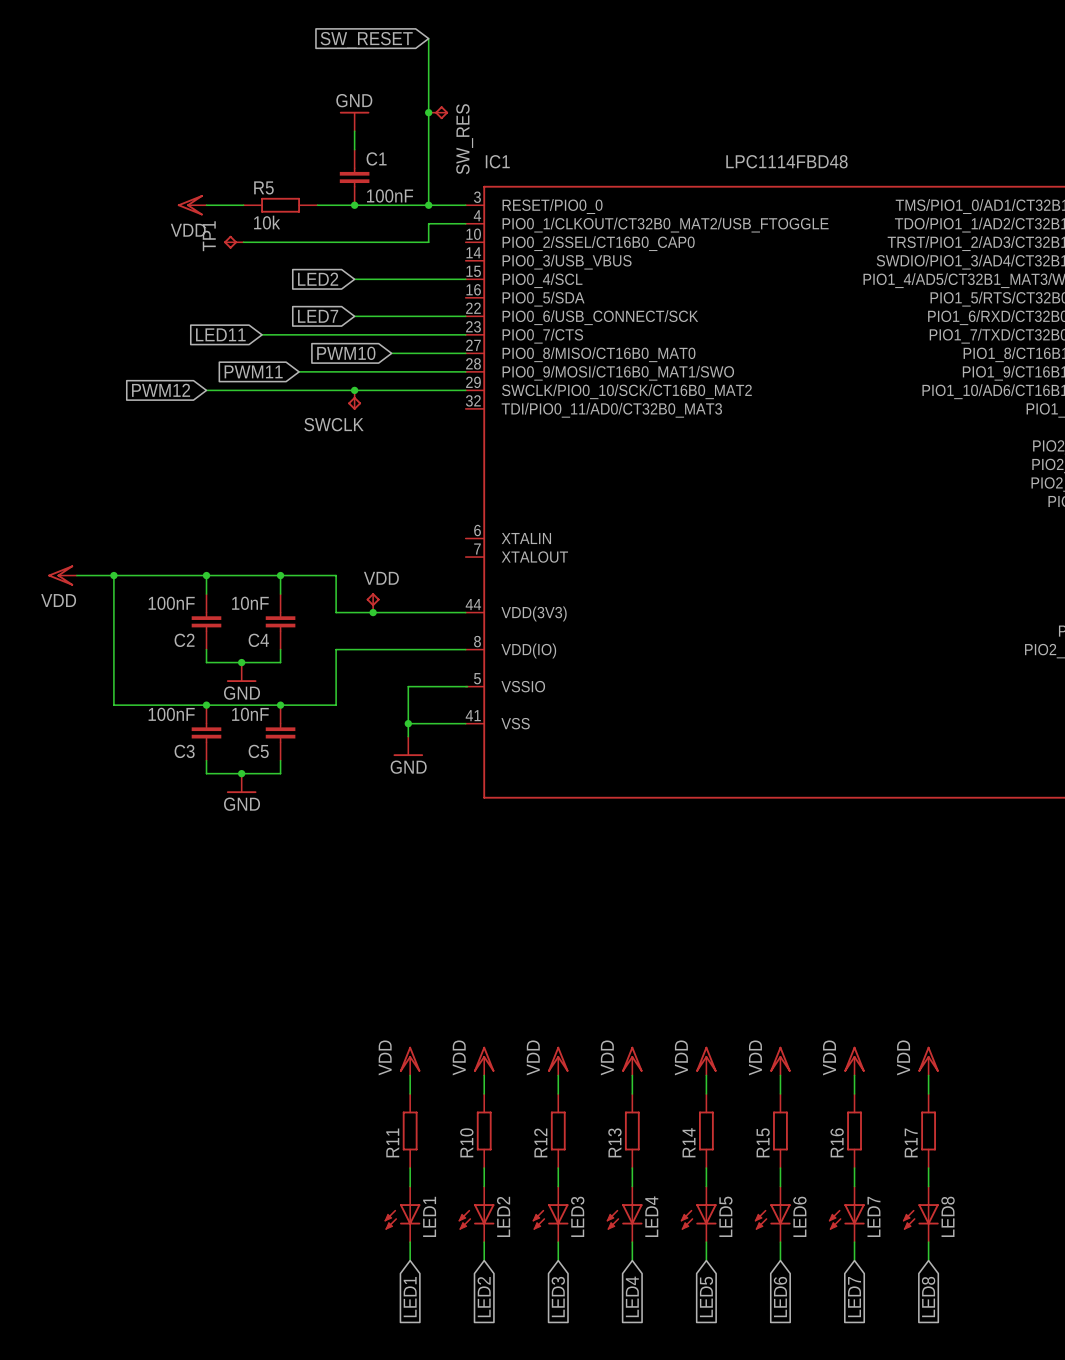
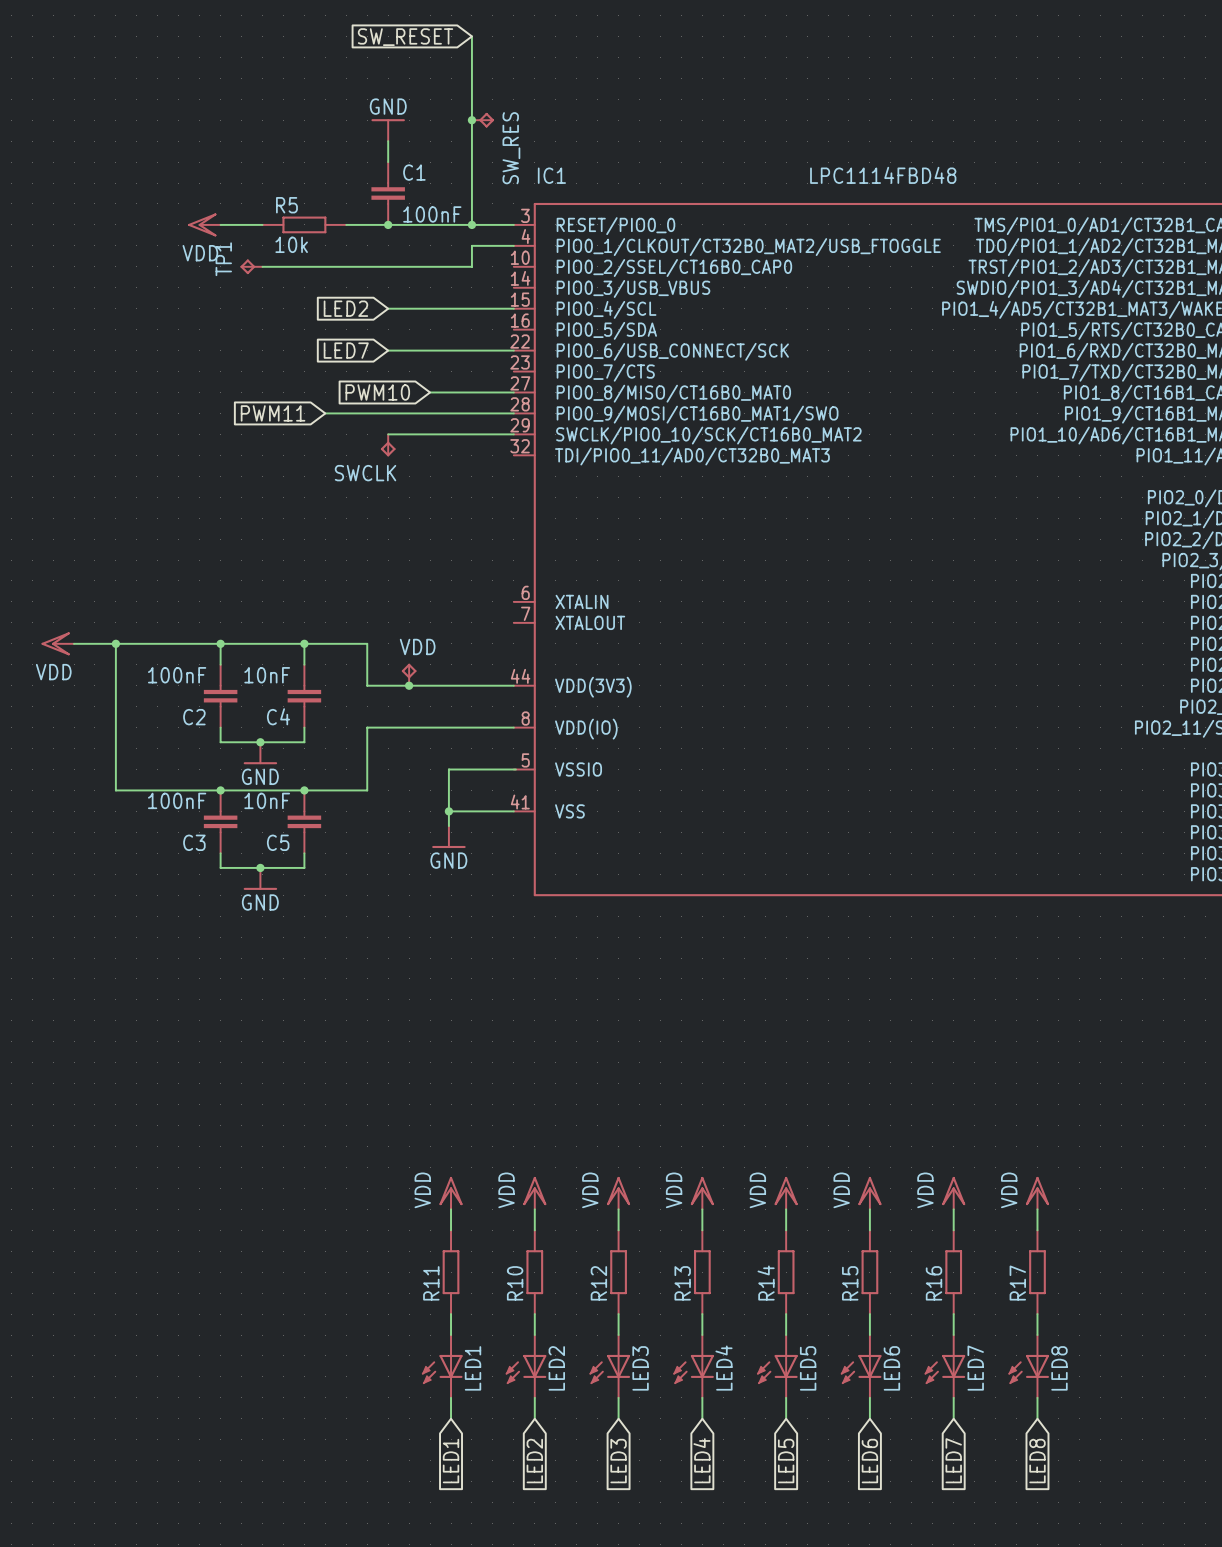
global label: LED11 (220, 334) -> none
wire: (262, 334) (465, 334) -> none
global label: PWM12 (161, 390) -> none
wire: (206, 390) (354, 390) -> none
junction: (354, 390) -> none

